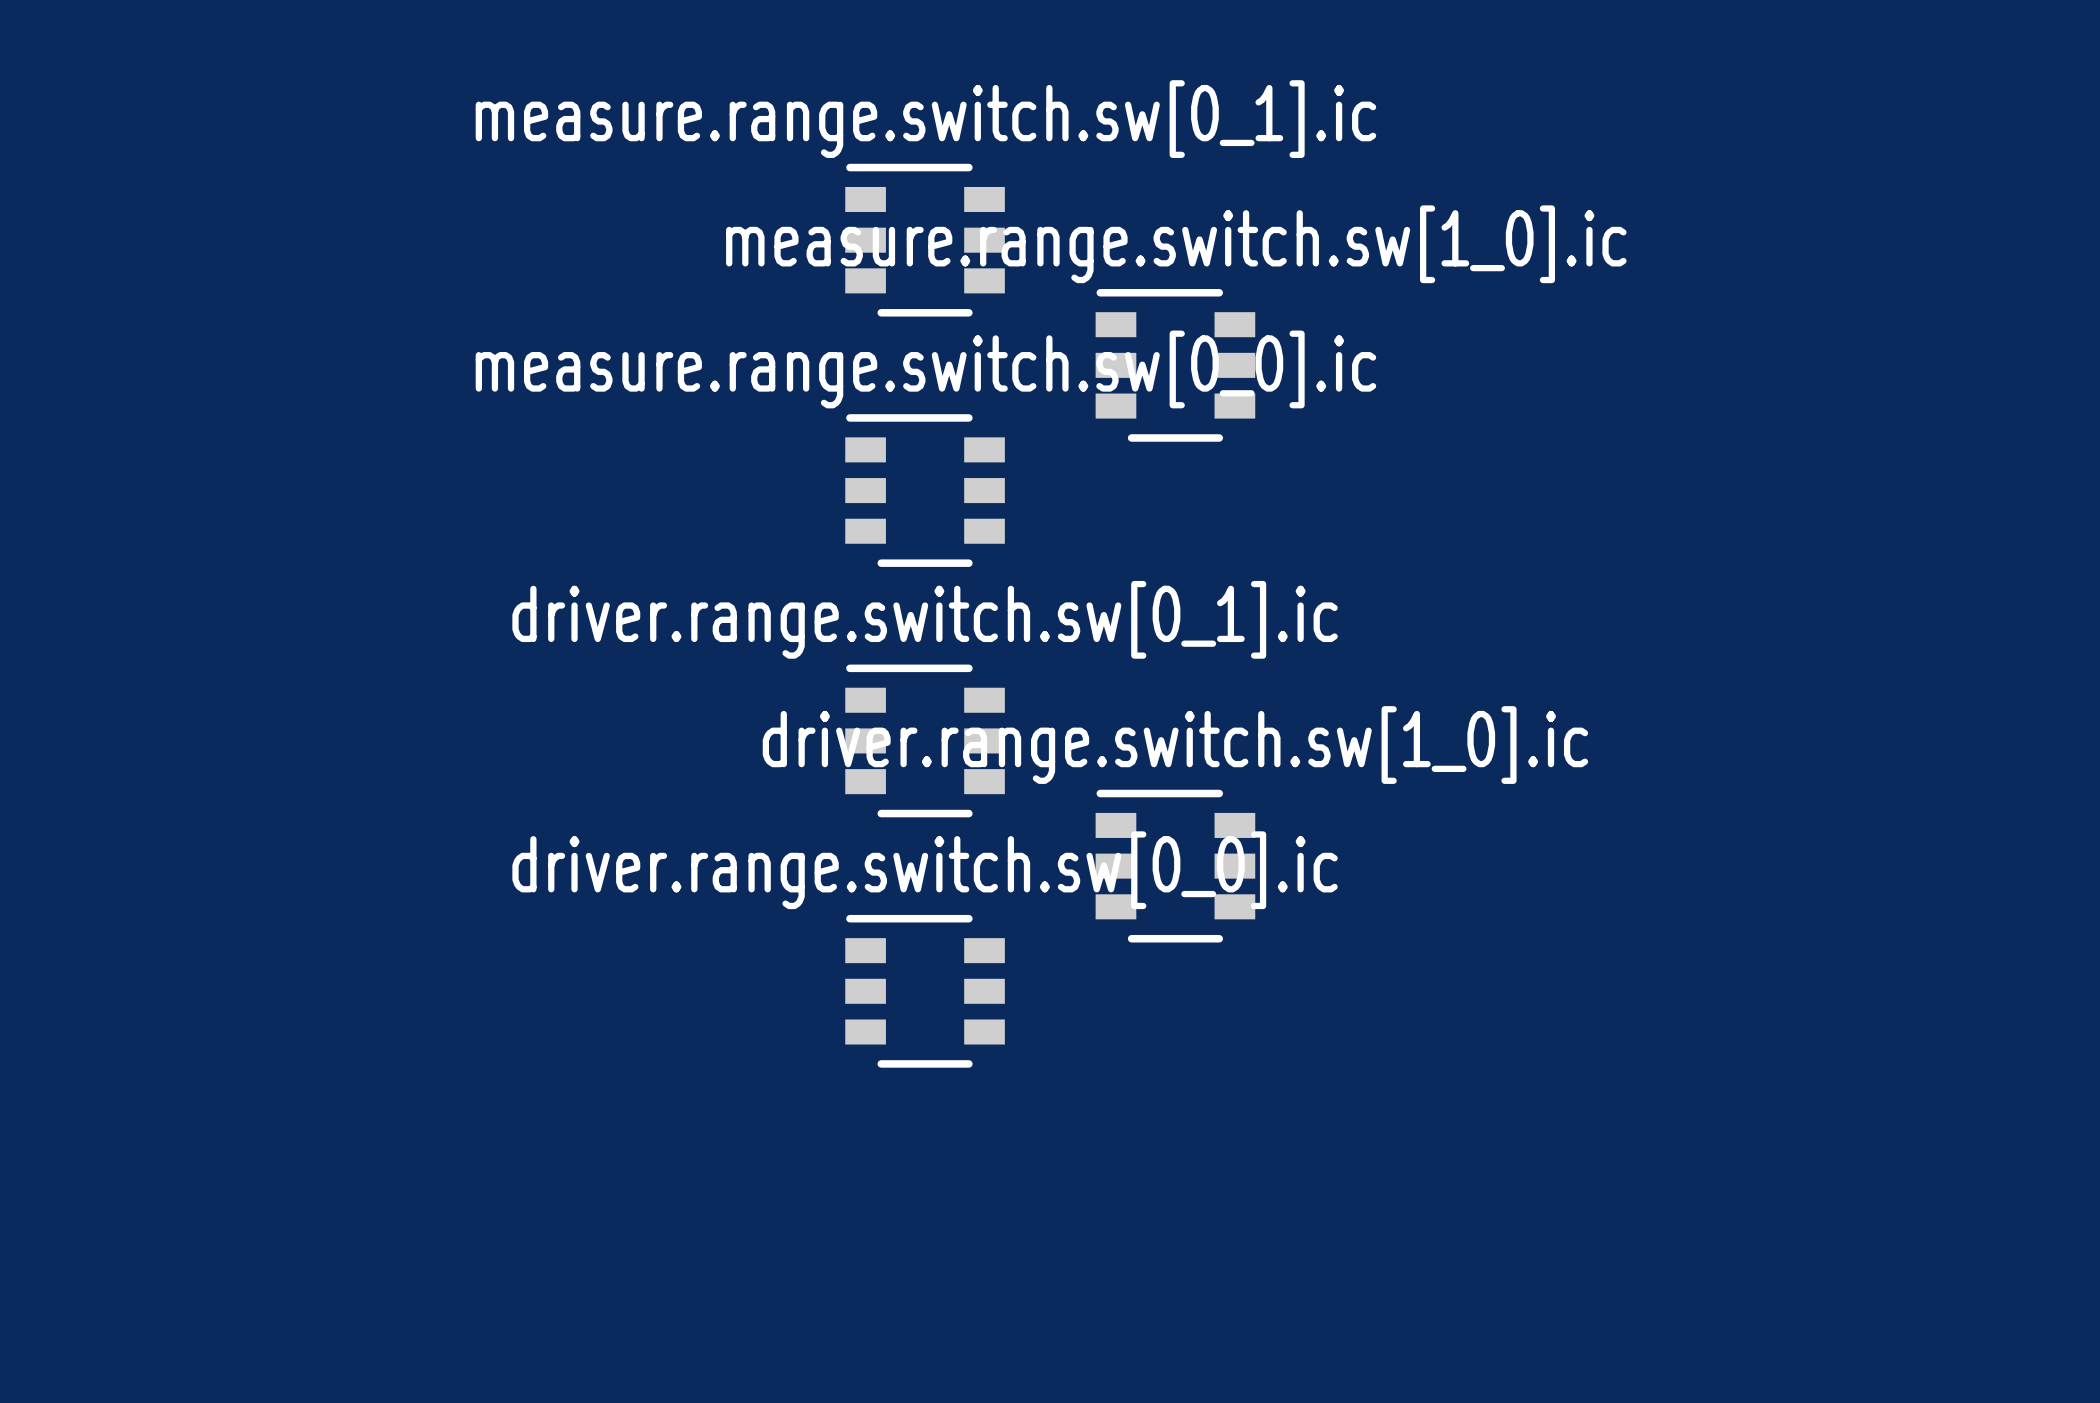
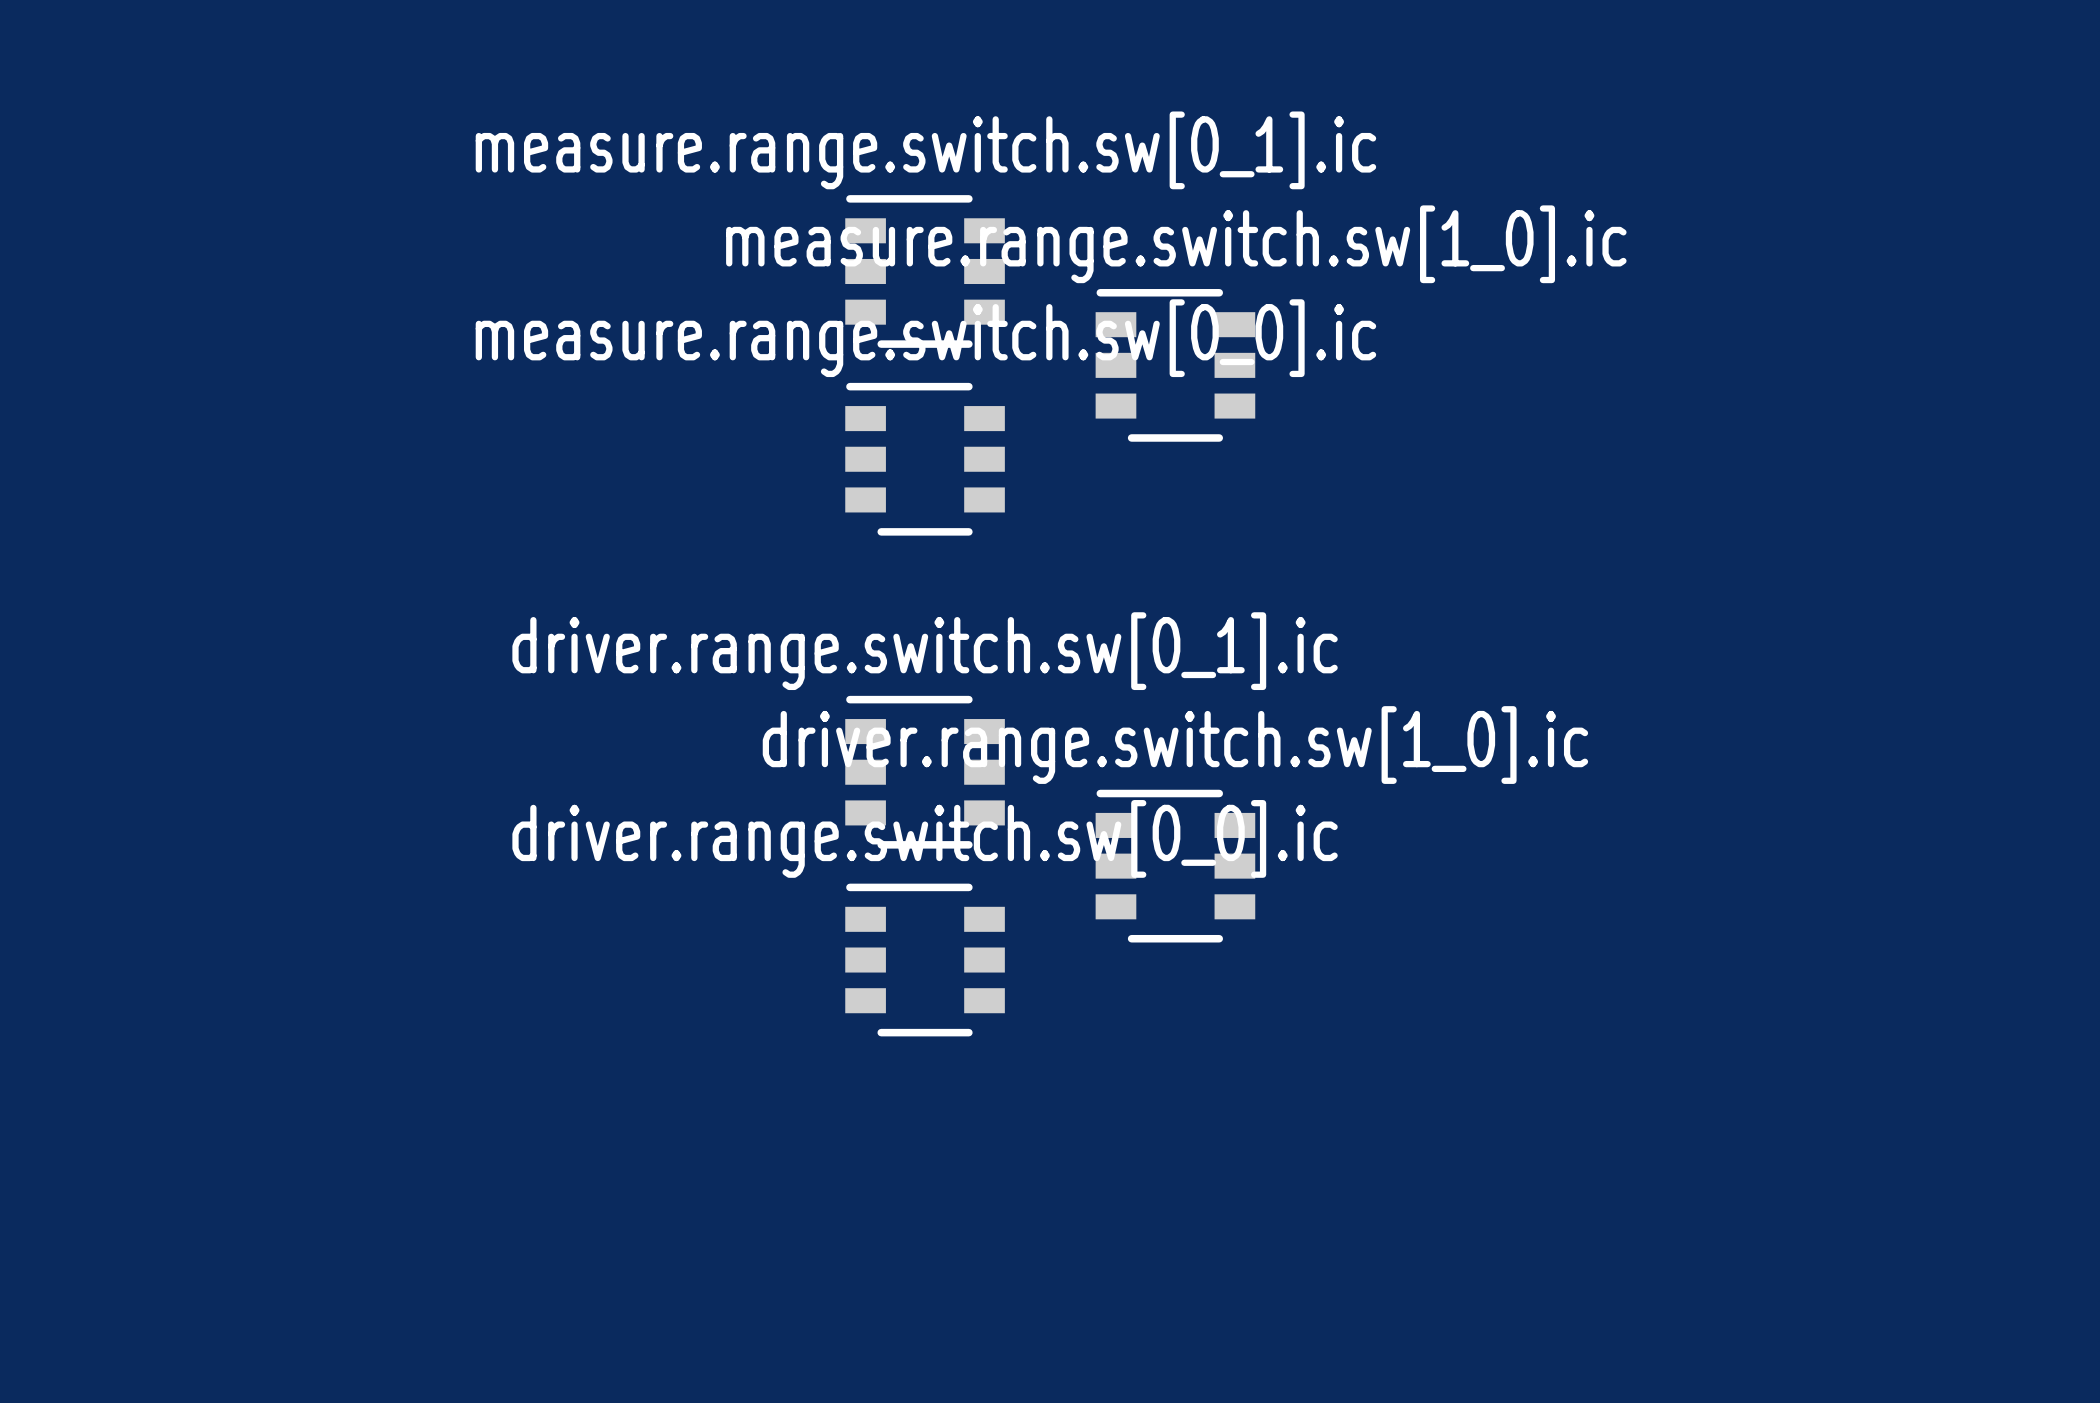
measure.range.switch.sw[0_1].ic position: (925, 240) -> (925, 271)
measure.range.switch.sw[0_0].ic position: (925, 490) -> (925, 459)
driver.range.switch.sw[0_1].ic position: (925, 740) -> (925, 772)
driver.range.switch.sw[0_0].ic position: (925, 991) -> (925, 960)

